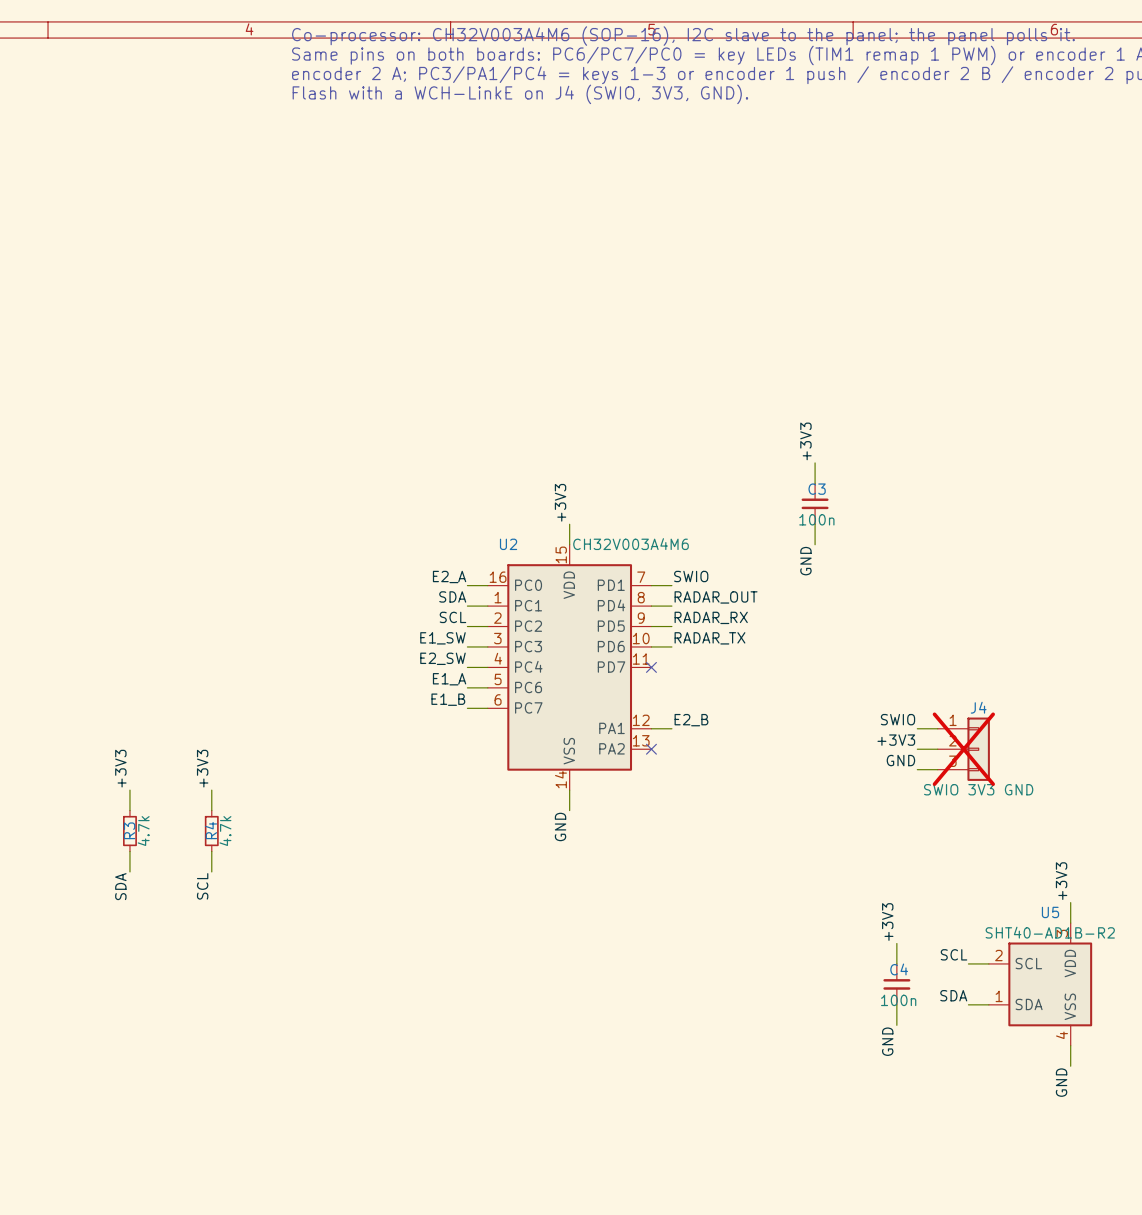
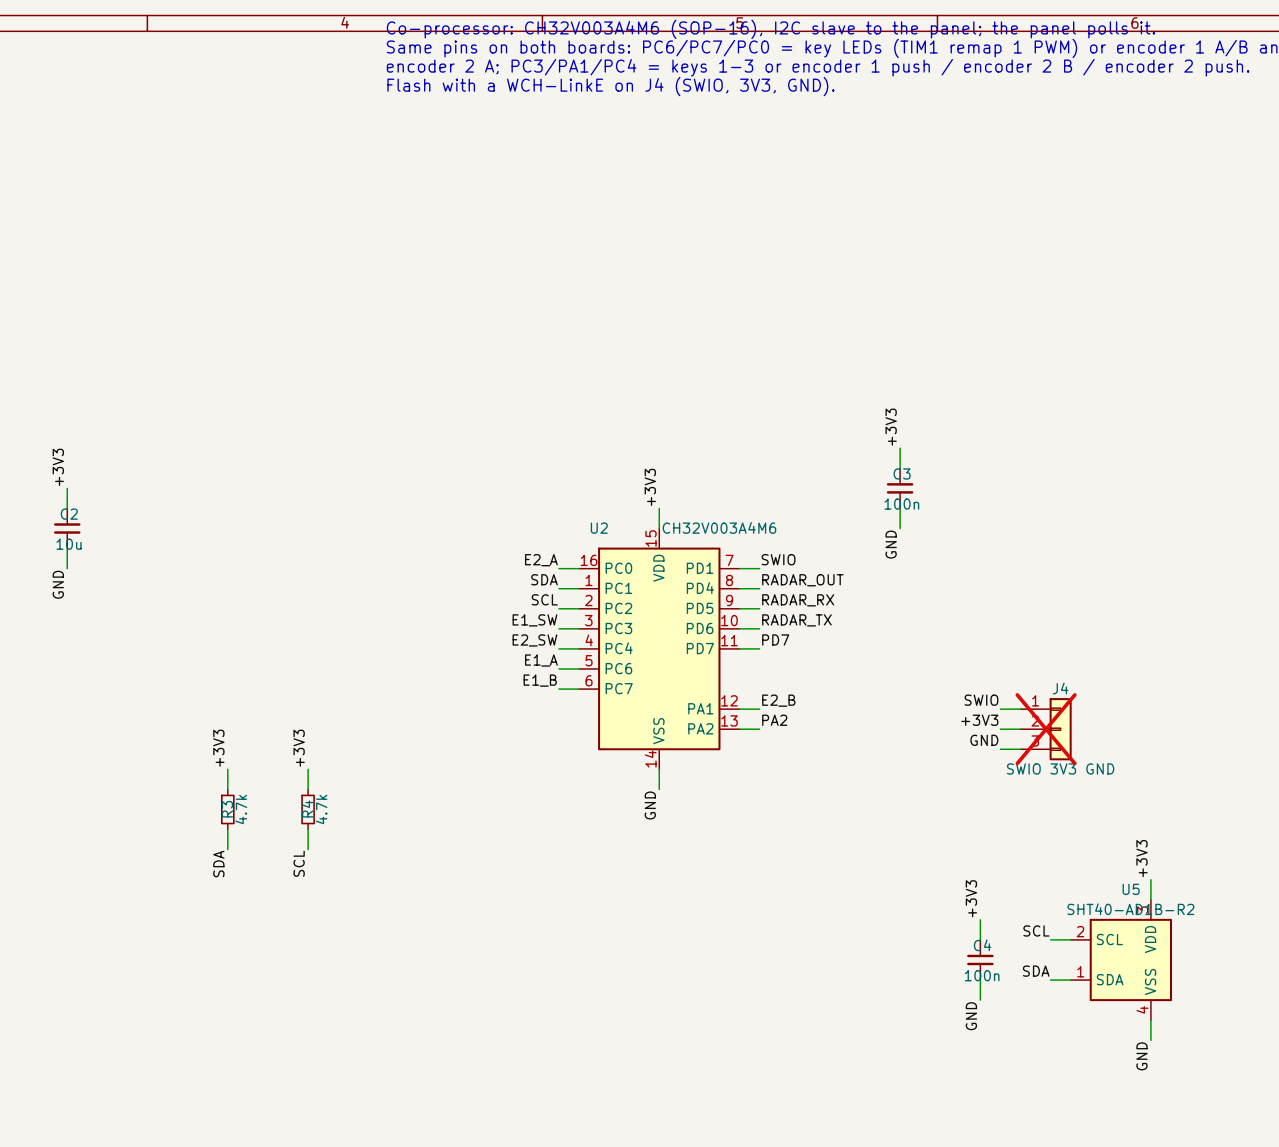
label: none -> PD7 (775, 639)
wire: none -> (739, 648) (759, 648)
no-connect mark: (651, 667) -> none
label: none -> PA2 (774, 720)
wire: none -> (739, 729) (759, 729)
no-connect mark: (651, 749) -> none

